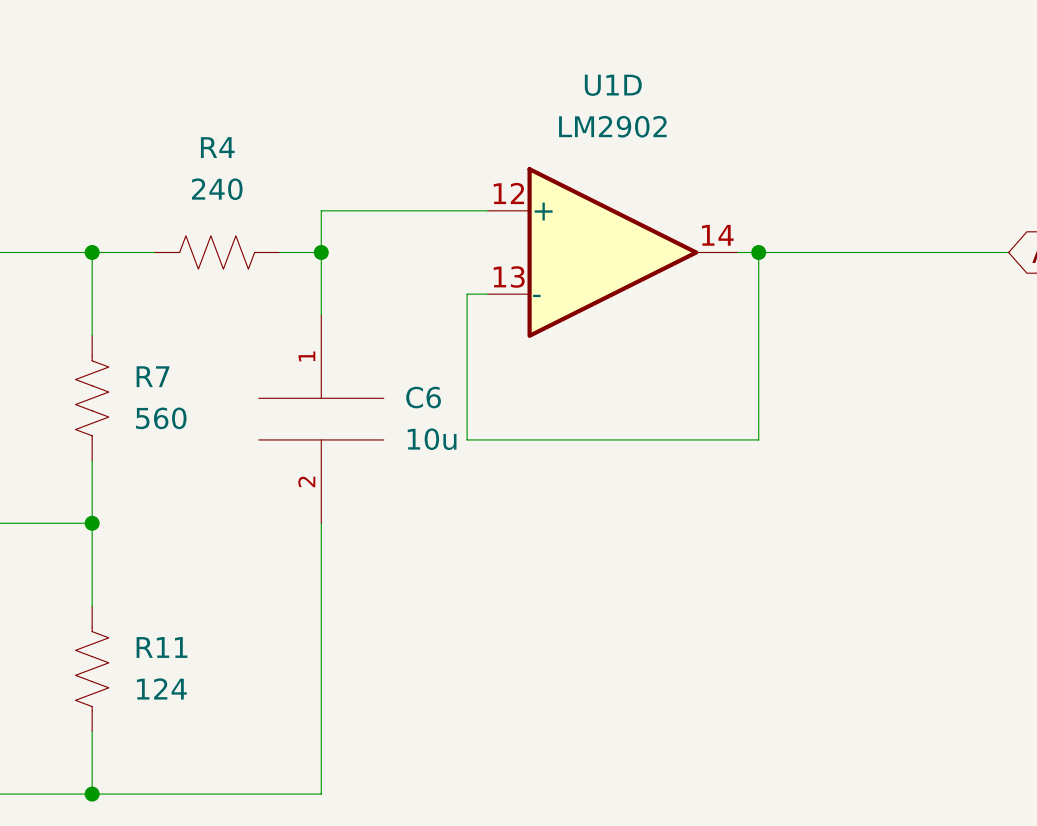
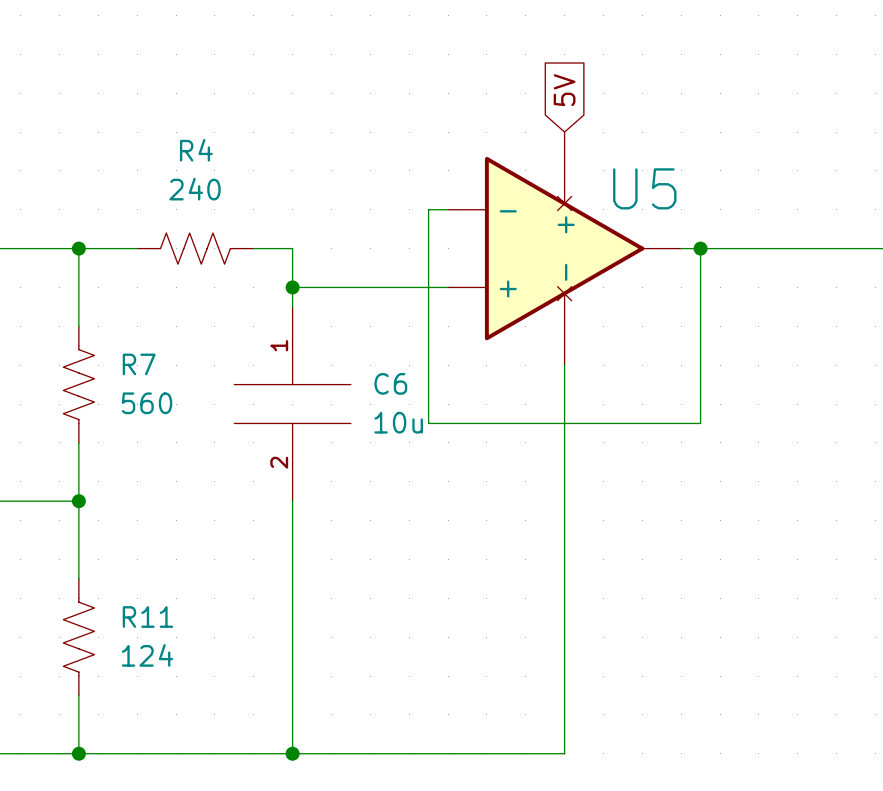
global label: none -> 5V (564, 90)
wire: (467, 210) (321, 210) (321, 252) -> (428, 209) (428, 287) (292, 287)
junction position: (321, 252) -> (292, 287)
U1D: LM2902 (612, 252) -> none
U5: none -> (564, 248)
wire: none -> (564, 365) (564, 753) (292, 753)
junction: none -> (292, 753)

